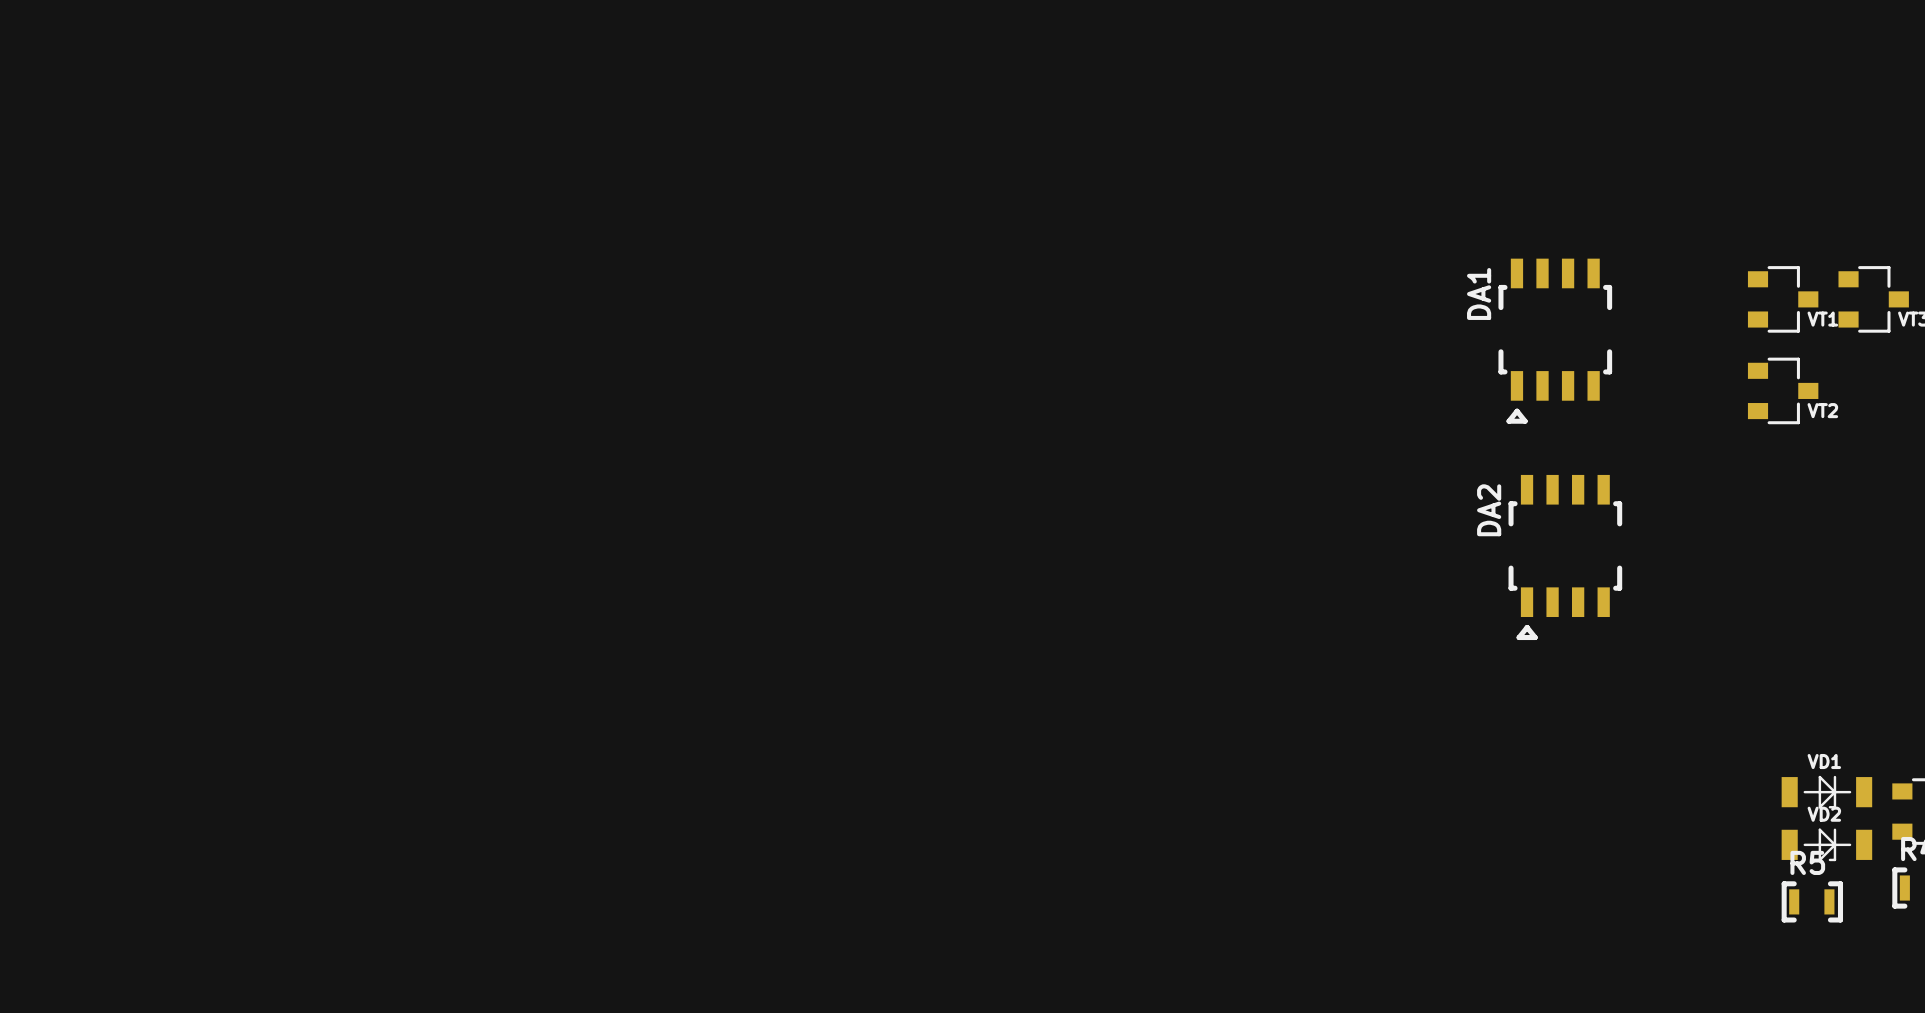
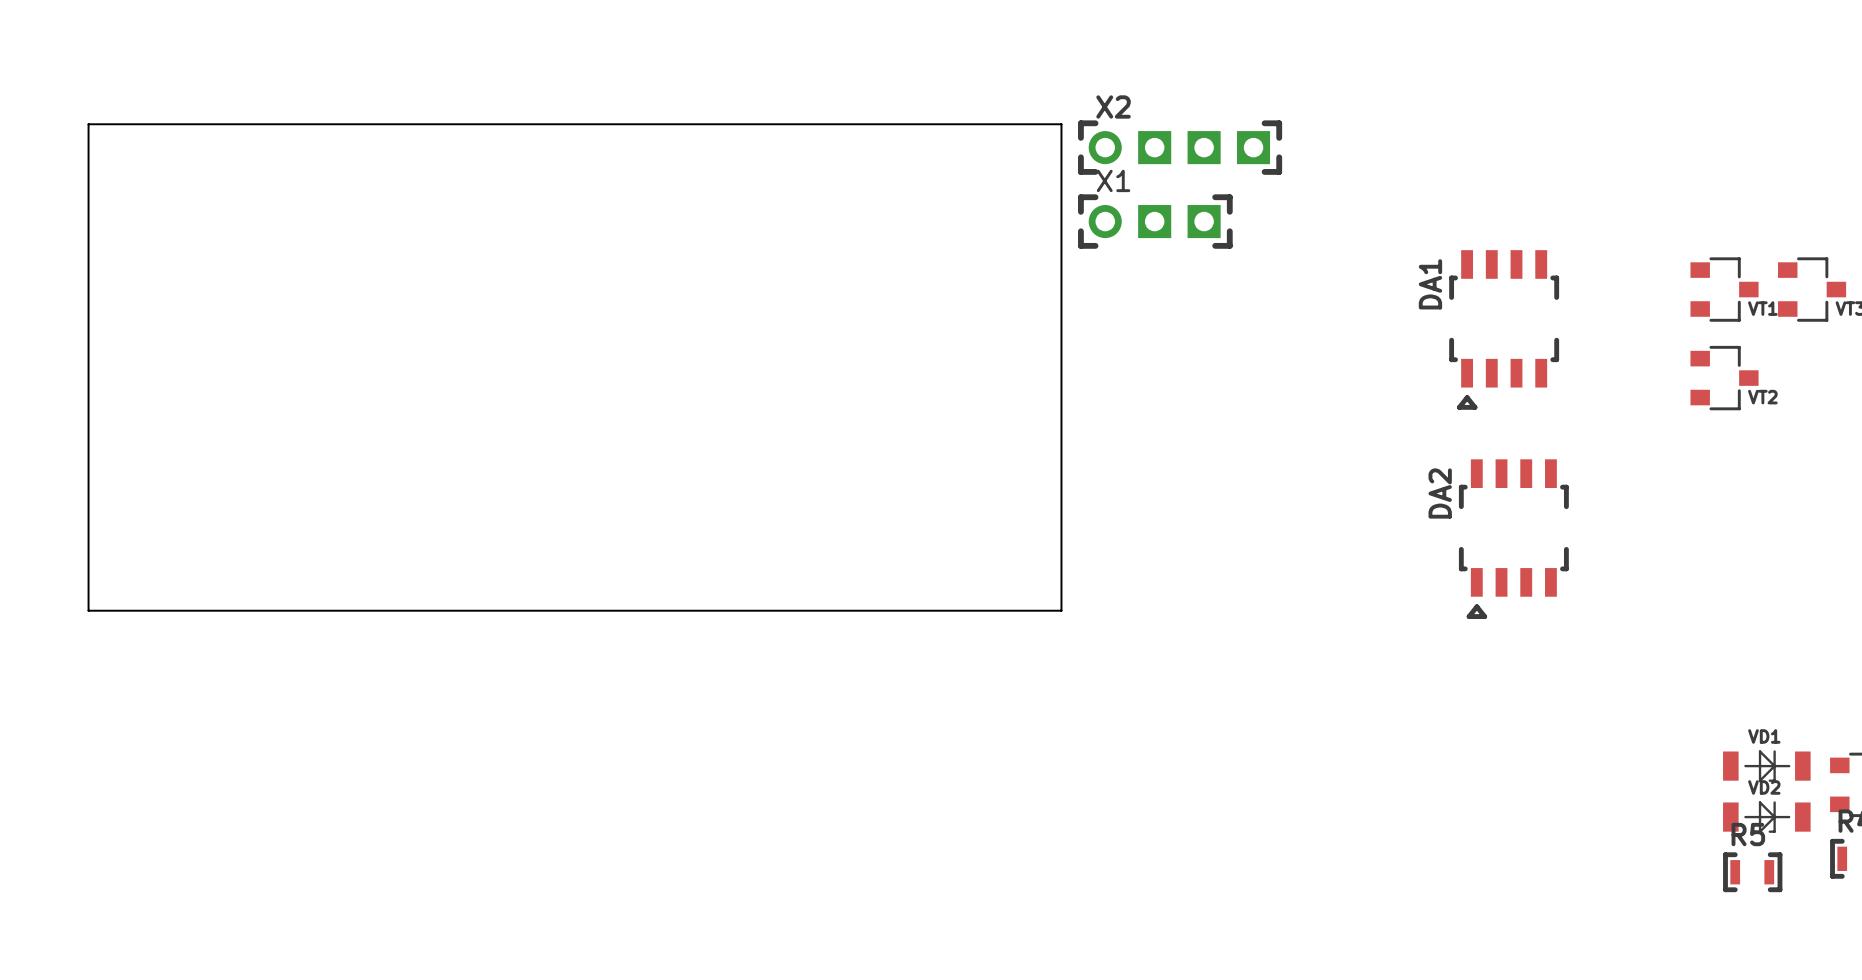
board edge: none -> (88, 124) (1061, 124) (1061, 610) (88, 610) (88, 124)
X2: none -> (1180, 147)
X1: none -> (1155, 221)

